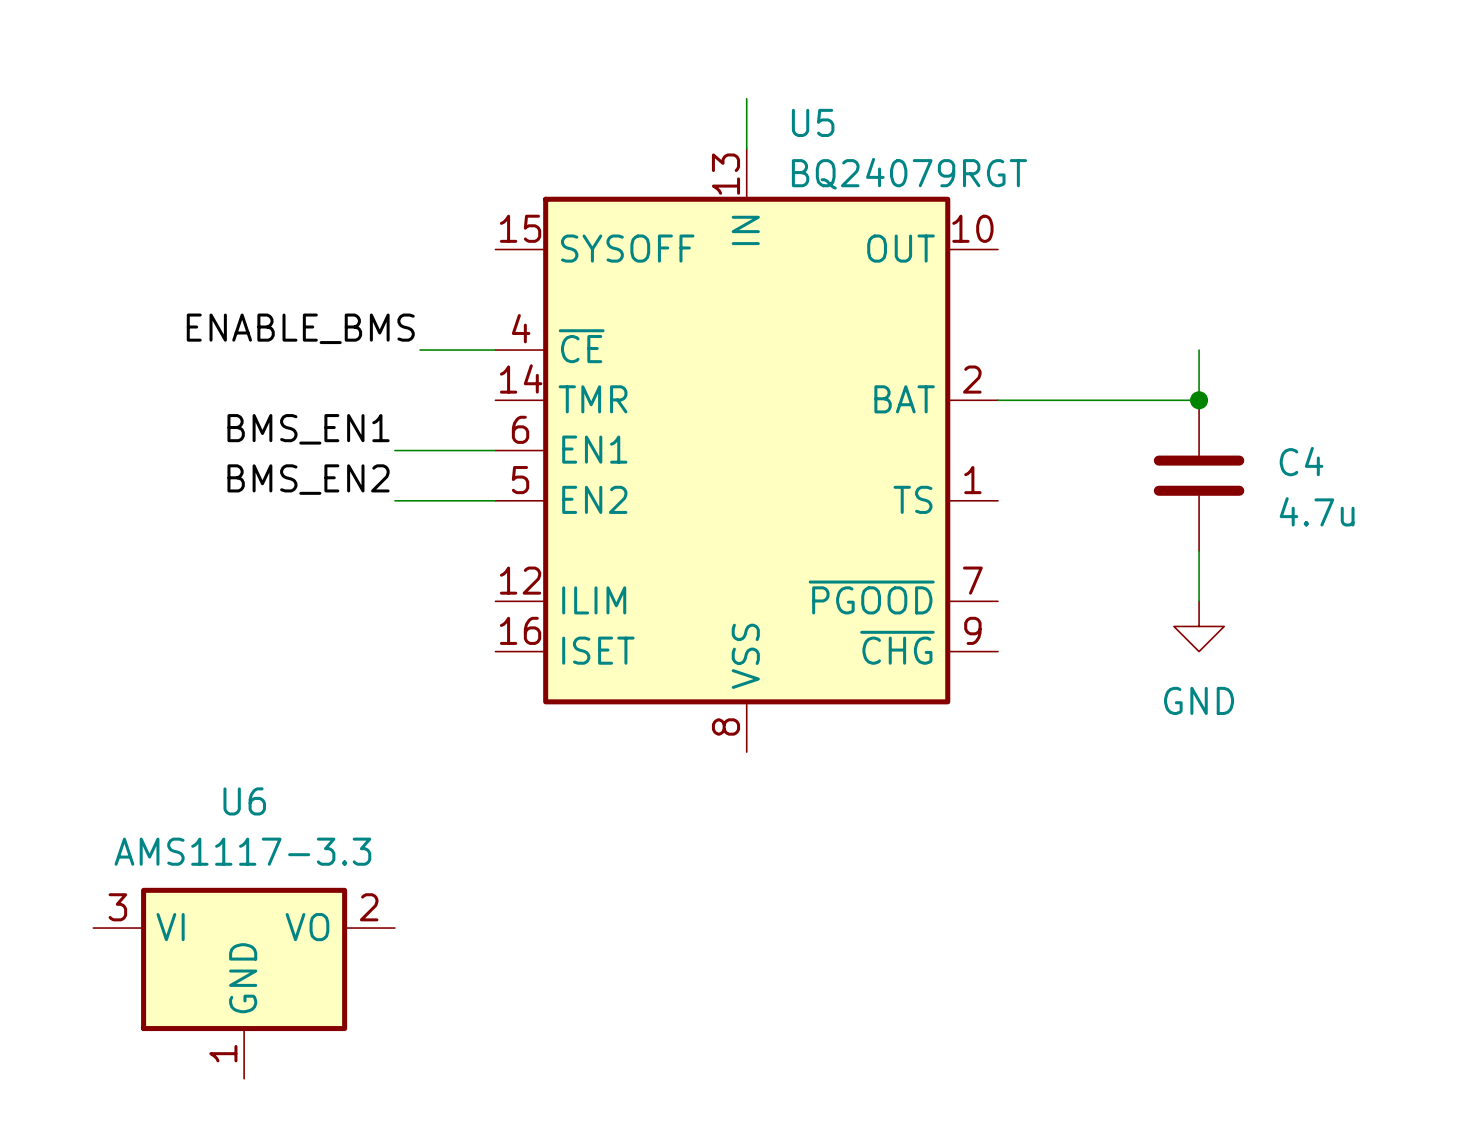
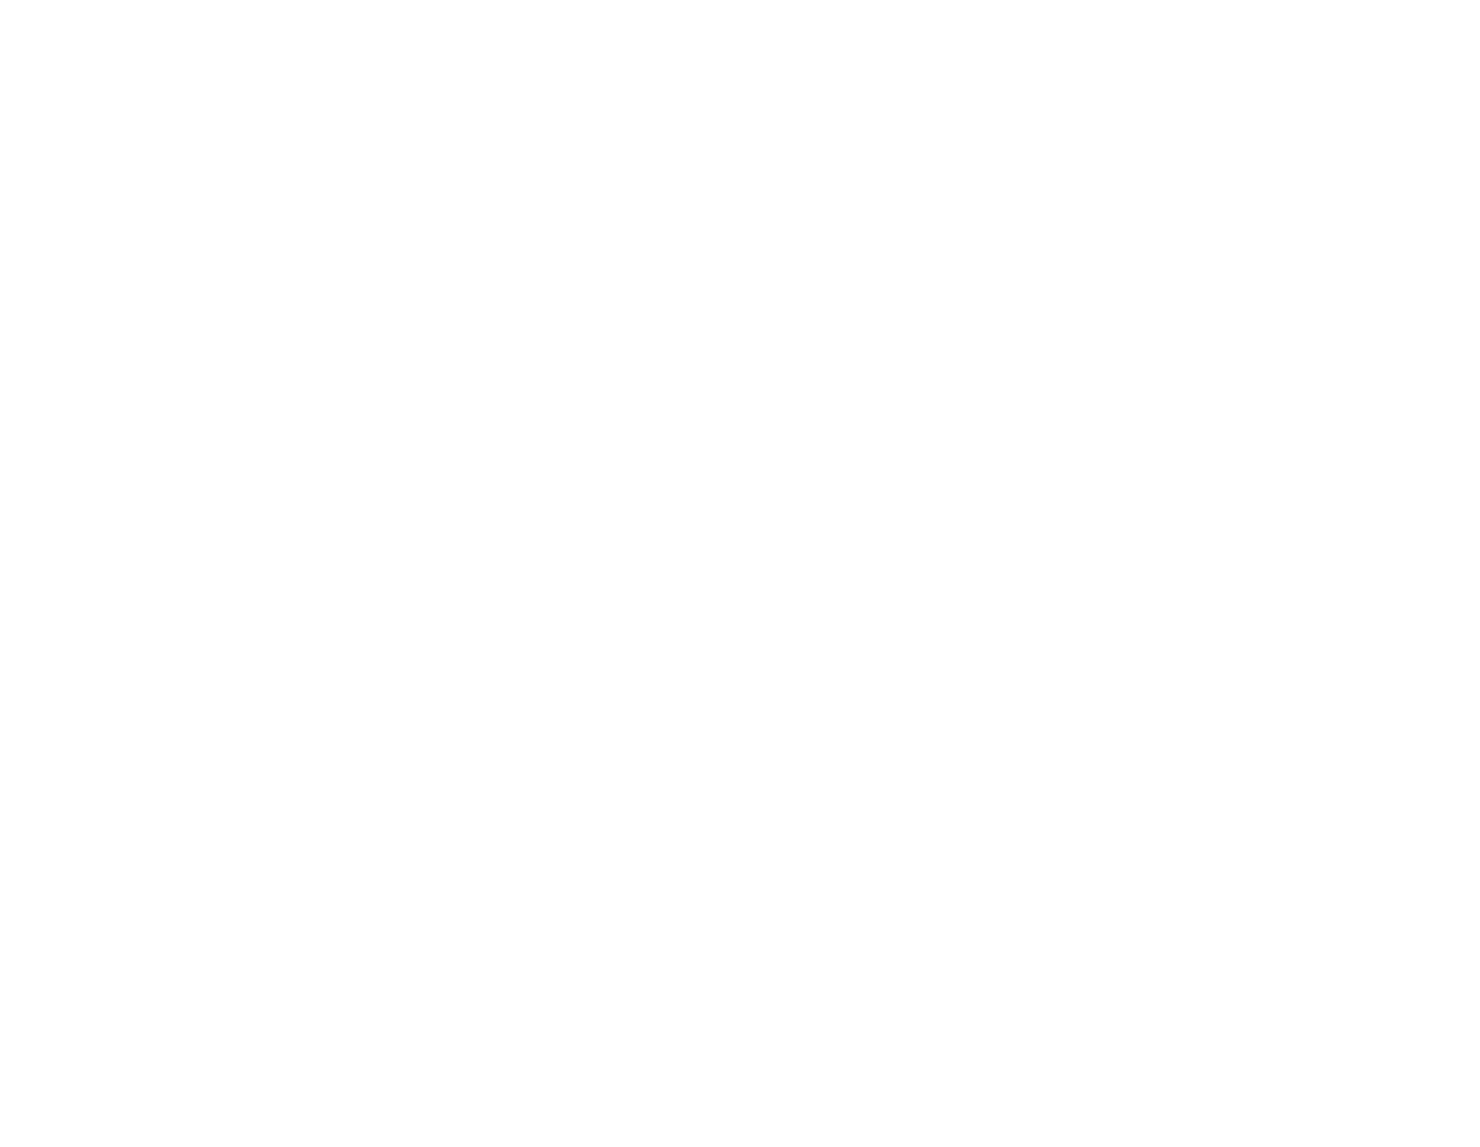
wire: (746, 98) (746, 148) -> none
label: ENABLE_BMS (300, 328) -> none
wire: (420, 350) (495, 350) -> none
wire: (1199, 350) (1199, 400) (998, 400) -> none
junction: (1199, 400) -> none
label: BMS_EN1 (308, 429) -> none
wire: (394, 450) (495, 450) -> none
U5: BQ24079RGT (746, 450) -> none
C4: 4.7u (1199, 475) -> none
label: BMS_EN2 (308, 479) -> none
wire: (394, 500) (495, 500) -> none
wire: (1199, 551) (1199, 601) -> none
power symbol: GND (1199, 626) -> none
U6: AMS1117-3.3 (244, 983) -> none

